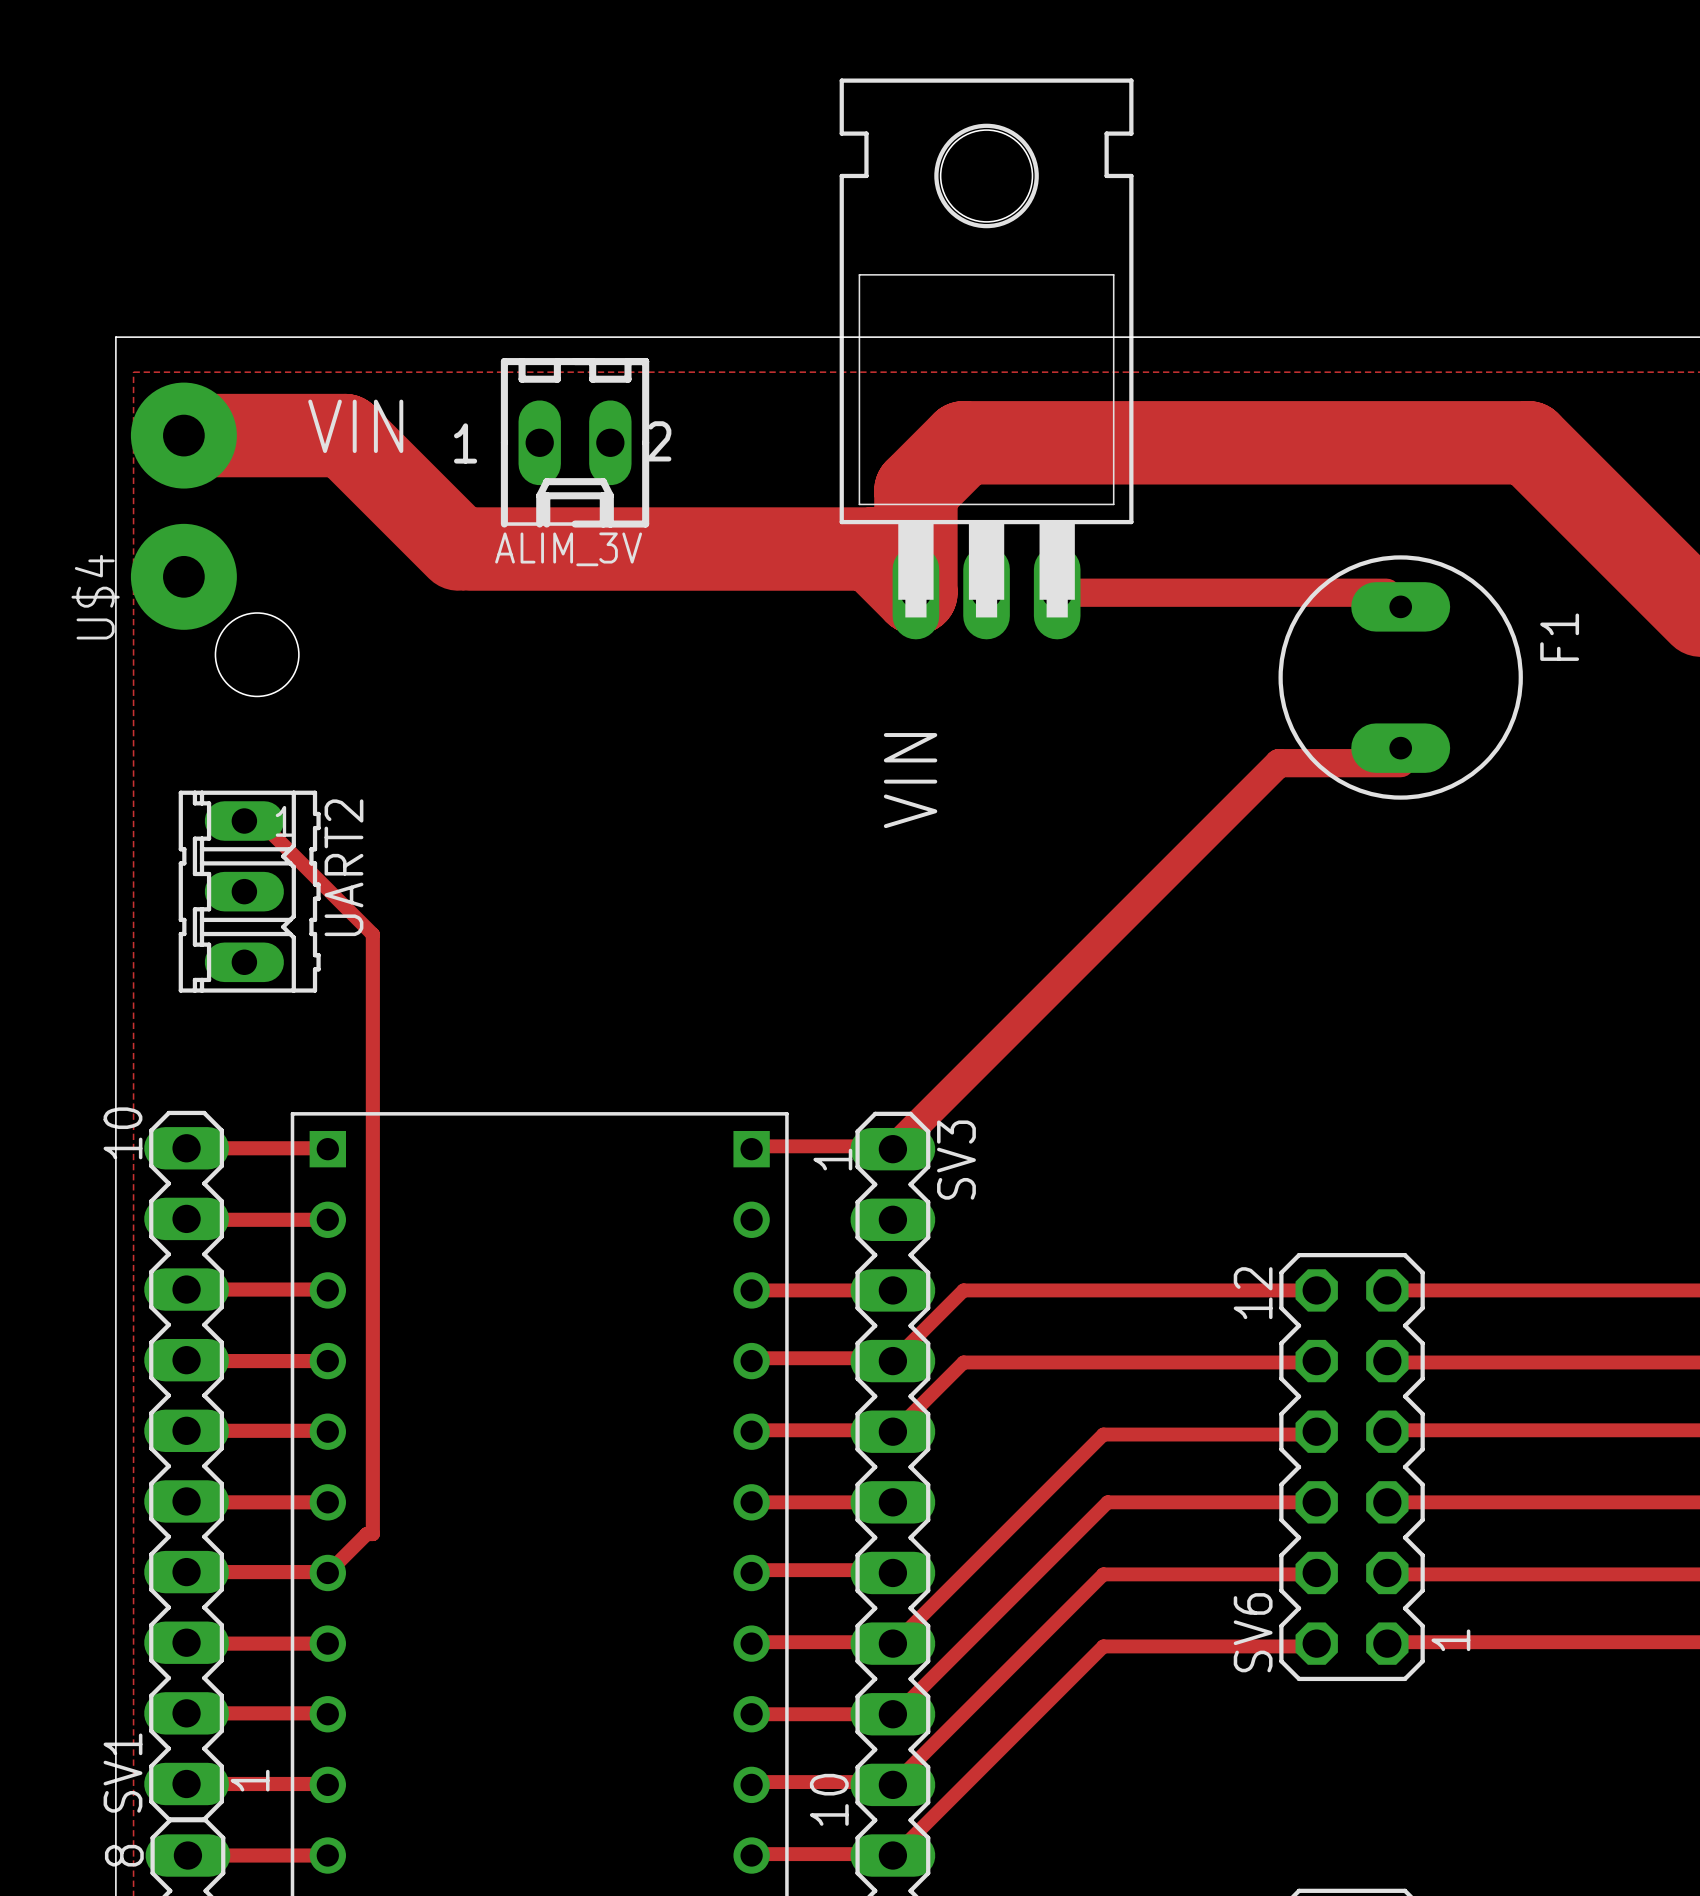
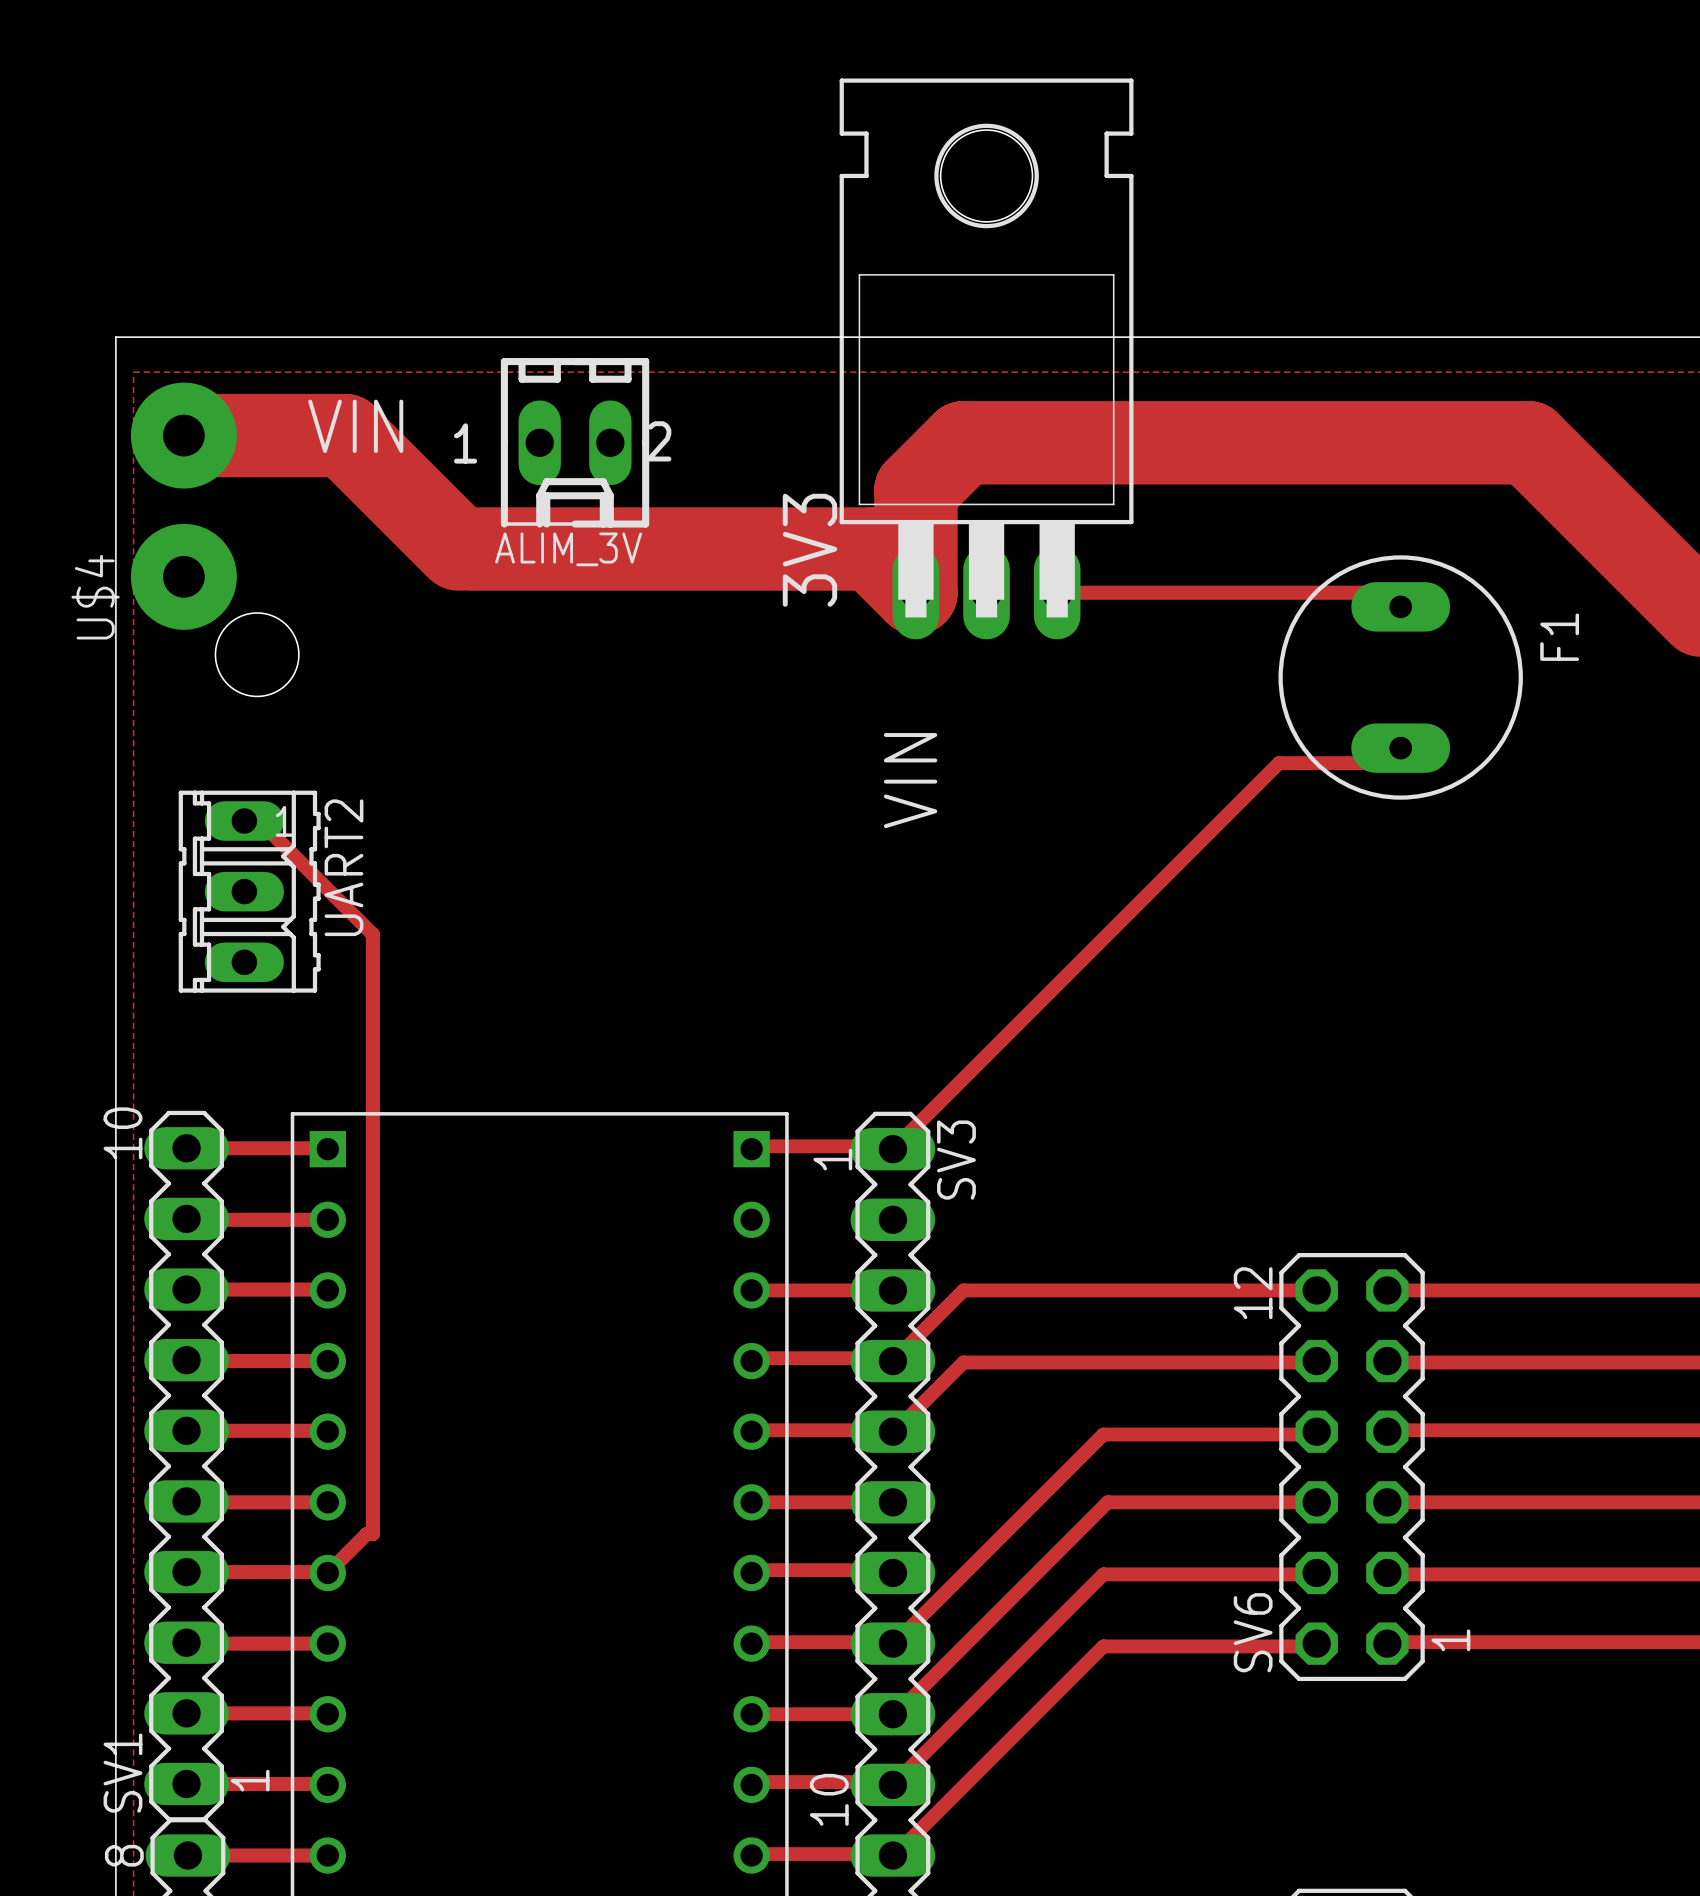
3V3 name: none -> 3V3 (809, 550)
track width: thick (1057, 592) (1386, 592) -> thin (1057, 592) (1386, 592)
track width: thick (1400, 763) (1278, 763) (892, 1149) -> thin (1400, 763) (1278, 763) (892, 1149)

